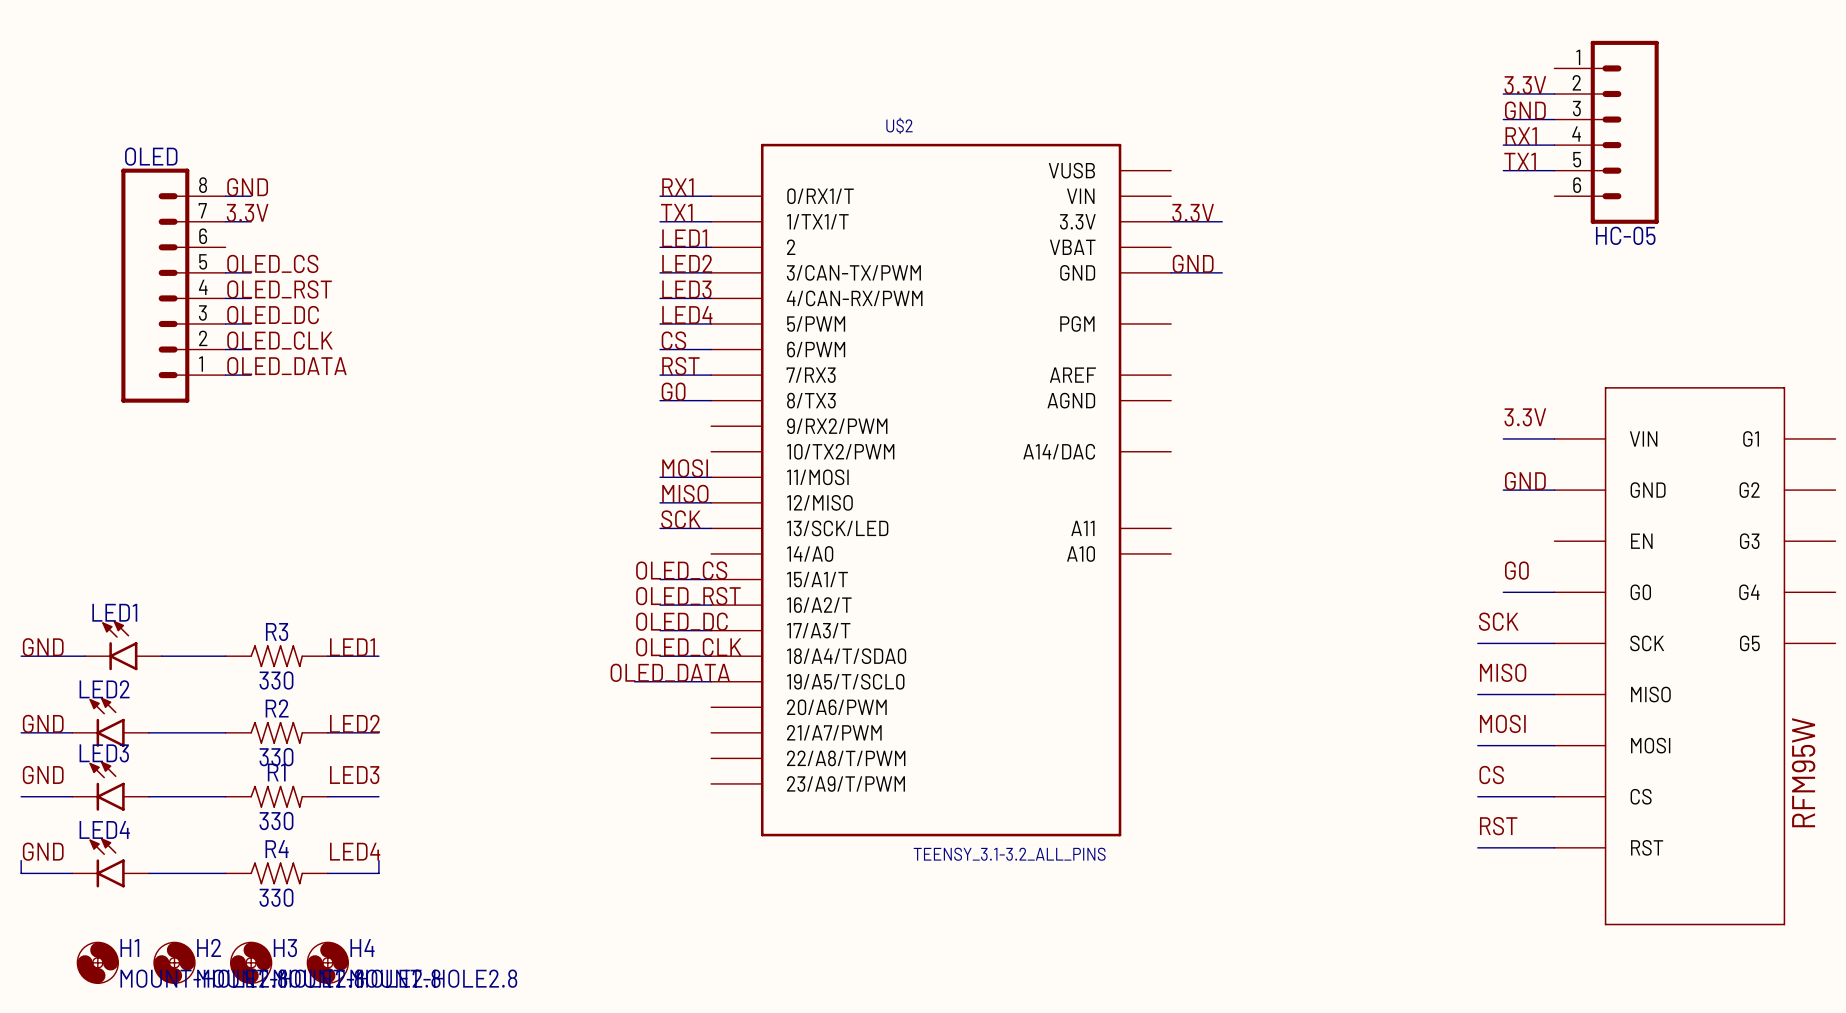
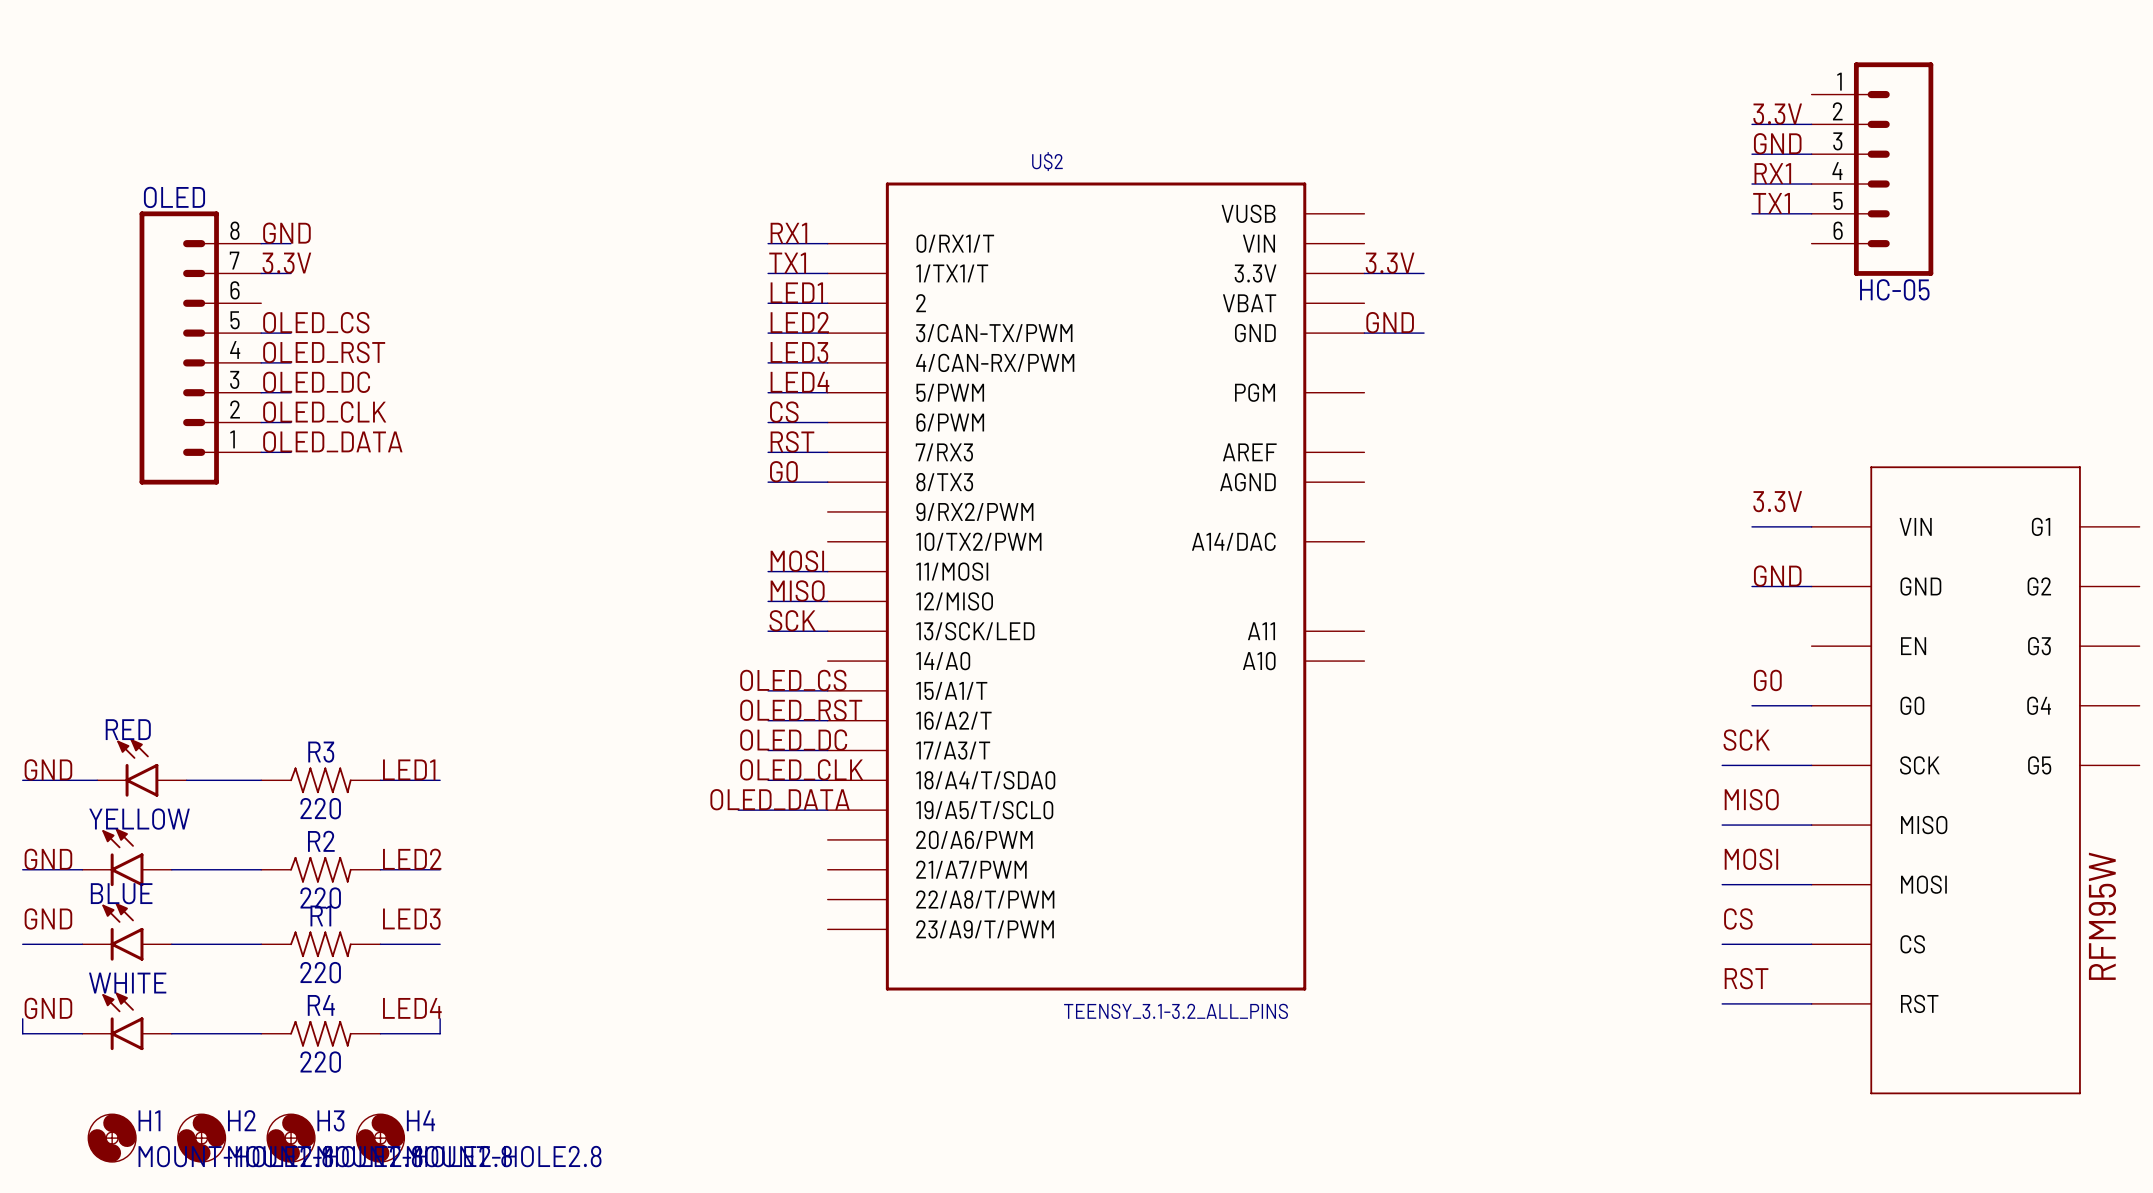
LED1 name: LED1 (114, 612) -> RED (128, 729)
R3 value: 330 (276, 680) -> 220 (320, 808)
LED2 name: LED2 (104, 689) -> YELLOW (139, 819)
LED3 name: LED3 (104, 753) -> BLUE (121, 893)
R2 value: 330 (276, 757) -> 220 (320, 898)
R1 value: 330 (276, 821) -> 220 (320, 972)
LED4 name: LED4 (104, 829) -> WHITE (127, 983)
R4 value: 330 (276, 897) -> 220 (320, 1062)

